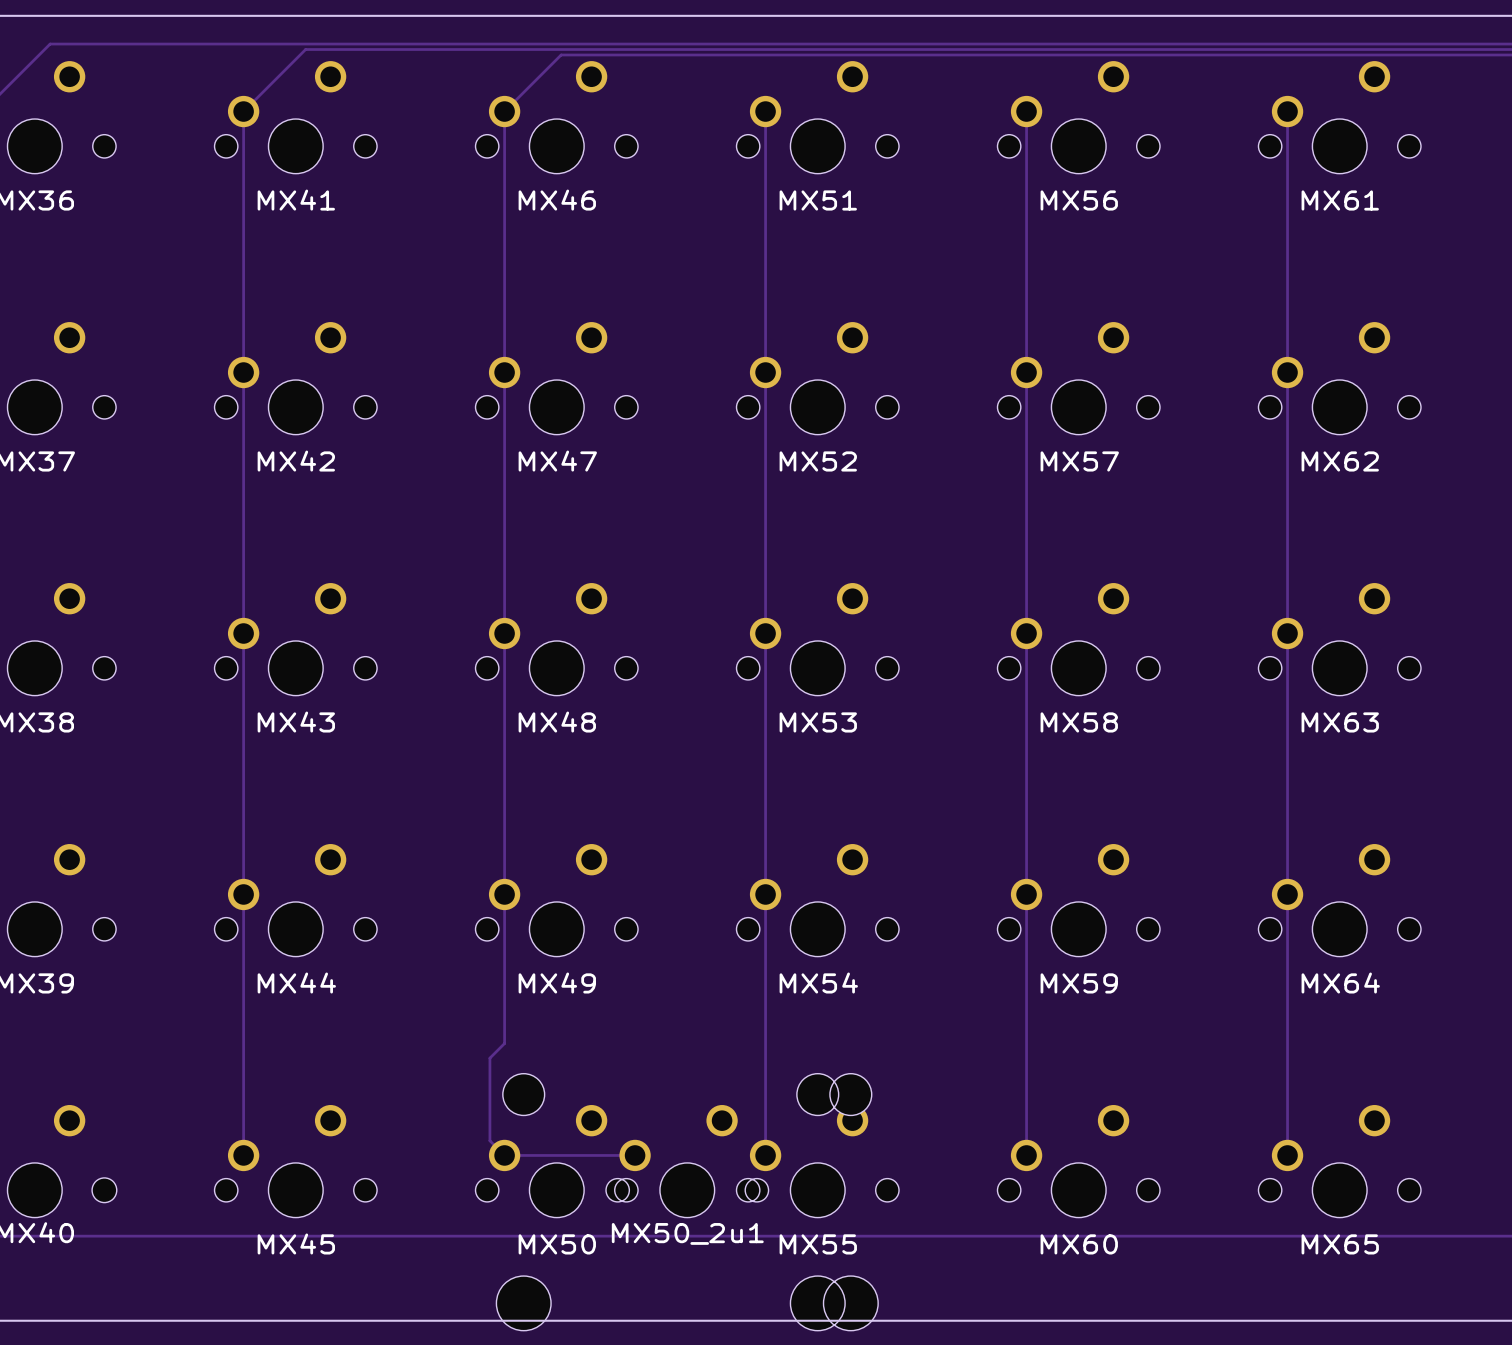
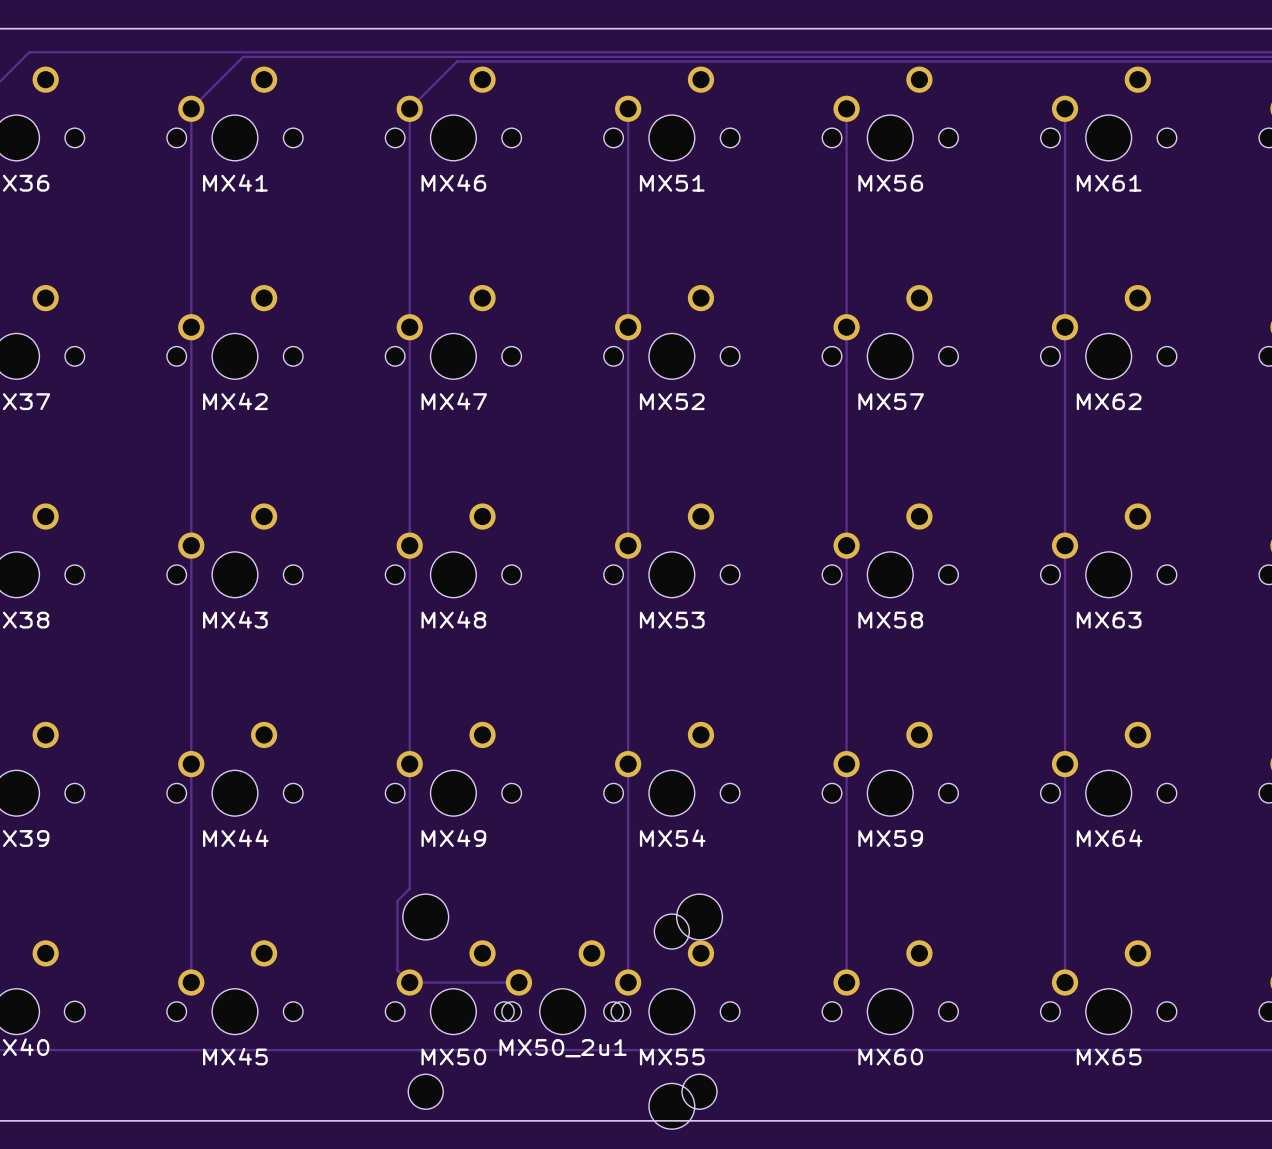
MX50_2u1 footprint: [496, 1073, 879, 1331] -> [402, 894, 723, 1110]

